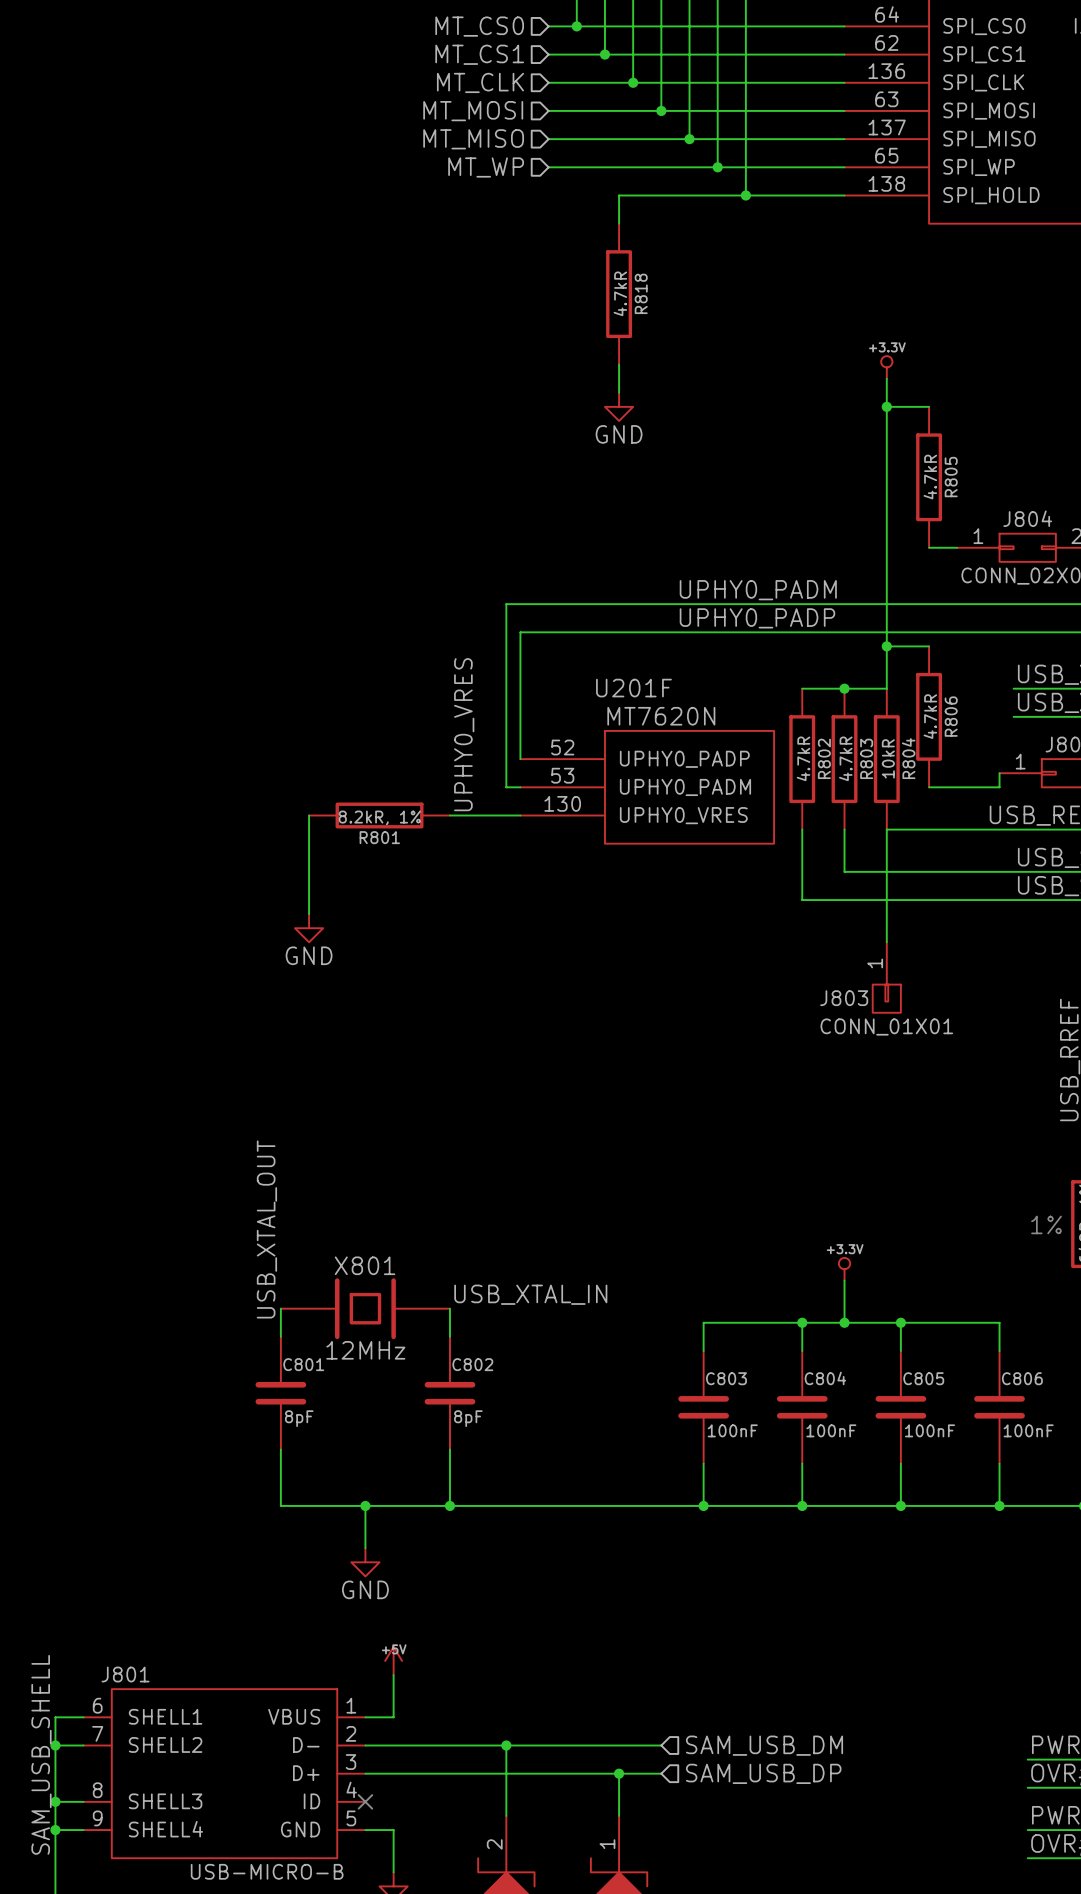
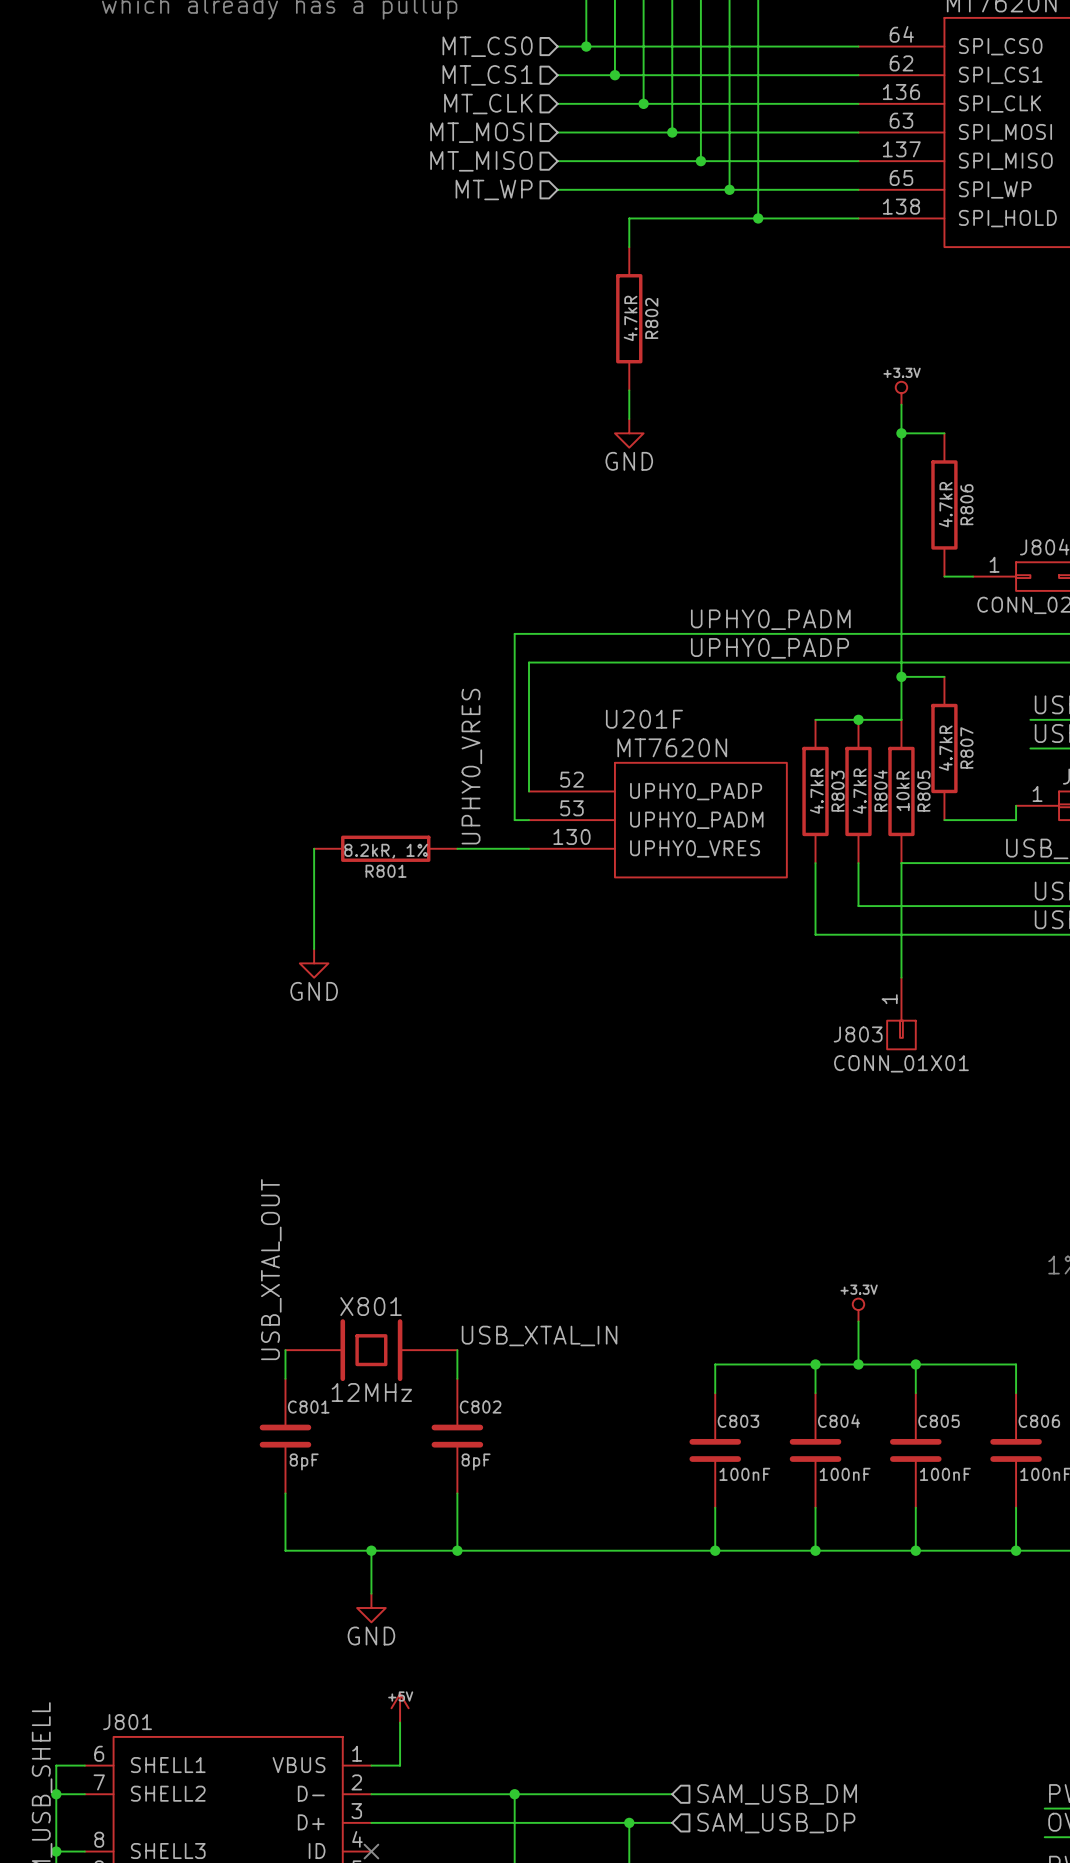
R818 name: R818 (641, 293) -> R802 (651, 318)
R805 name: R805 (951, 477) -> R806 (966, 504)
R806 name: R806 (951, 716) -> R807 (966, 747)
R802 name: R802 (824, 758) -> R803 (838, 791)
R803 name: R803 (866, 758) -> R804 (880, 790)
R804 name: R804 (908, 758) -> R805 (923, 791)

